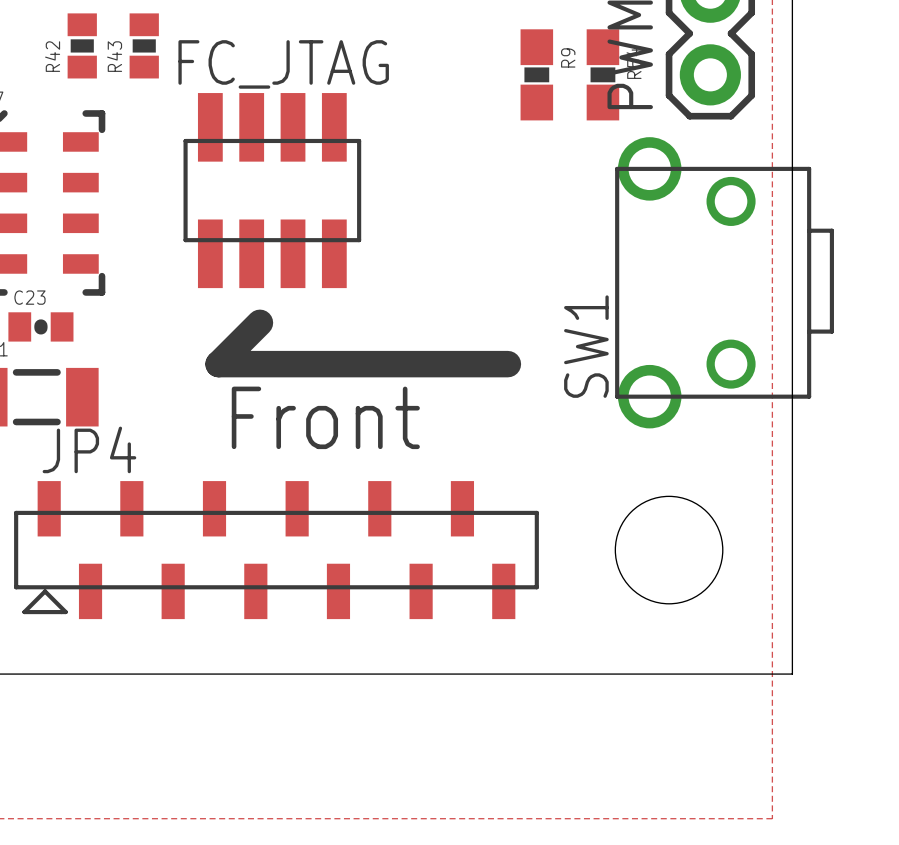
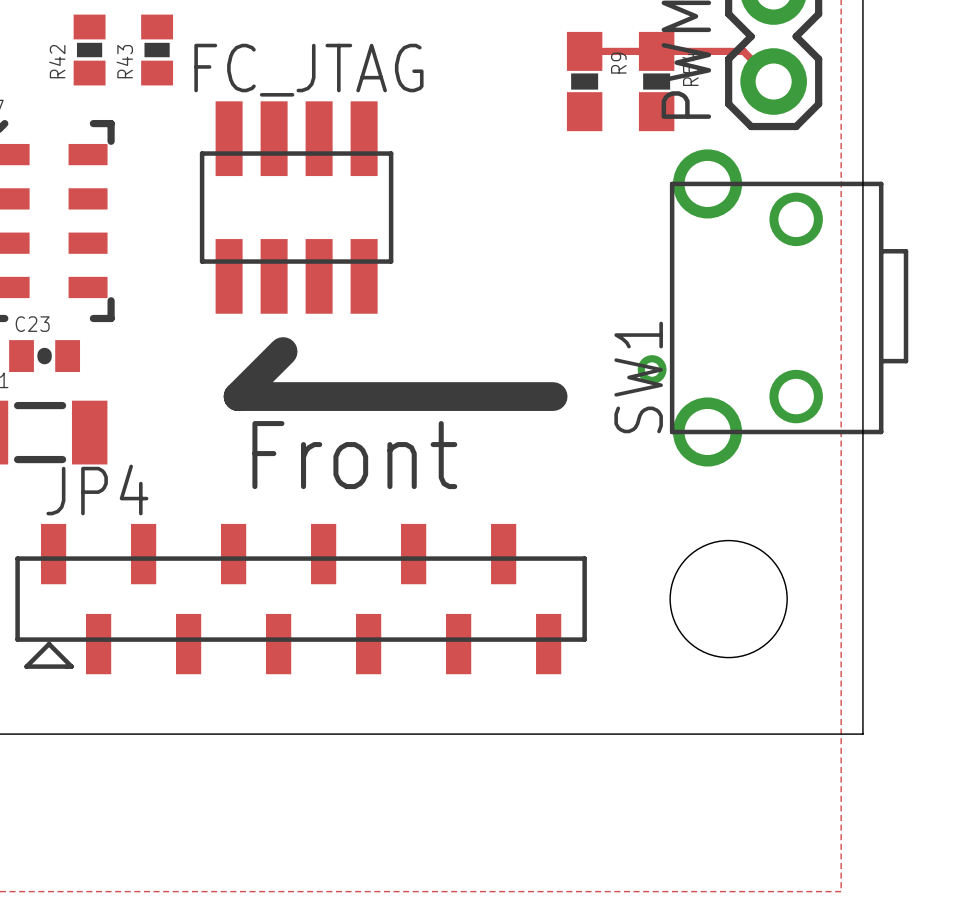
track: none -> (584, 51) (743, 51) (773, 81)
via: none -> (652, 369)

